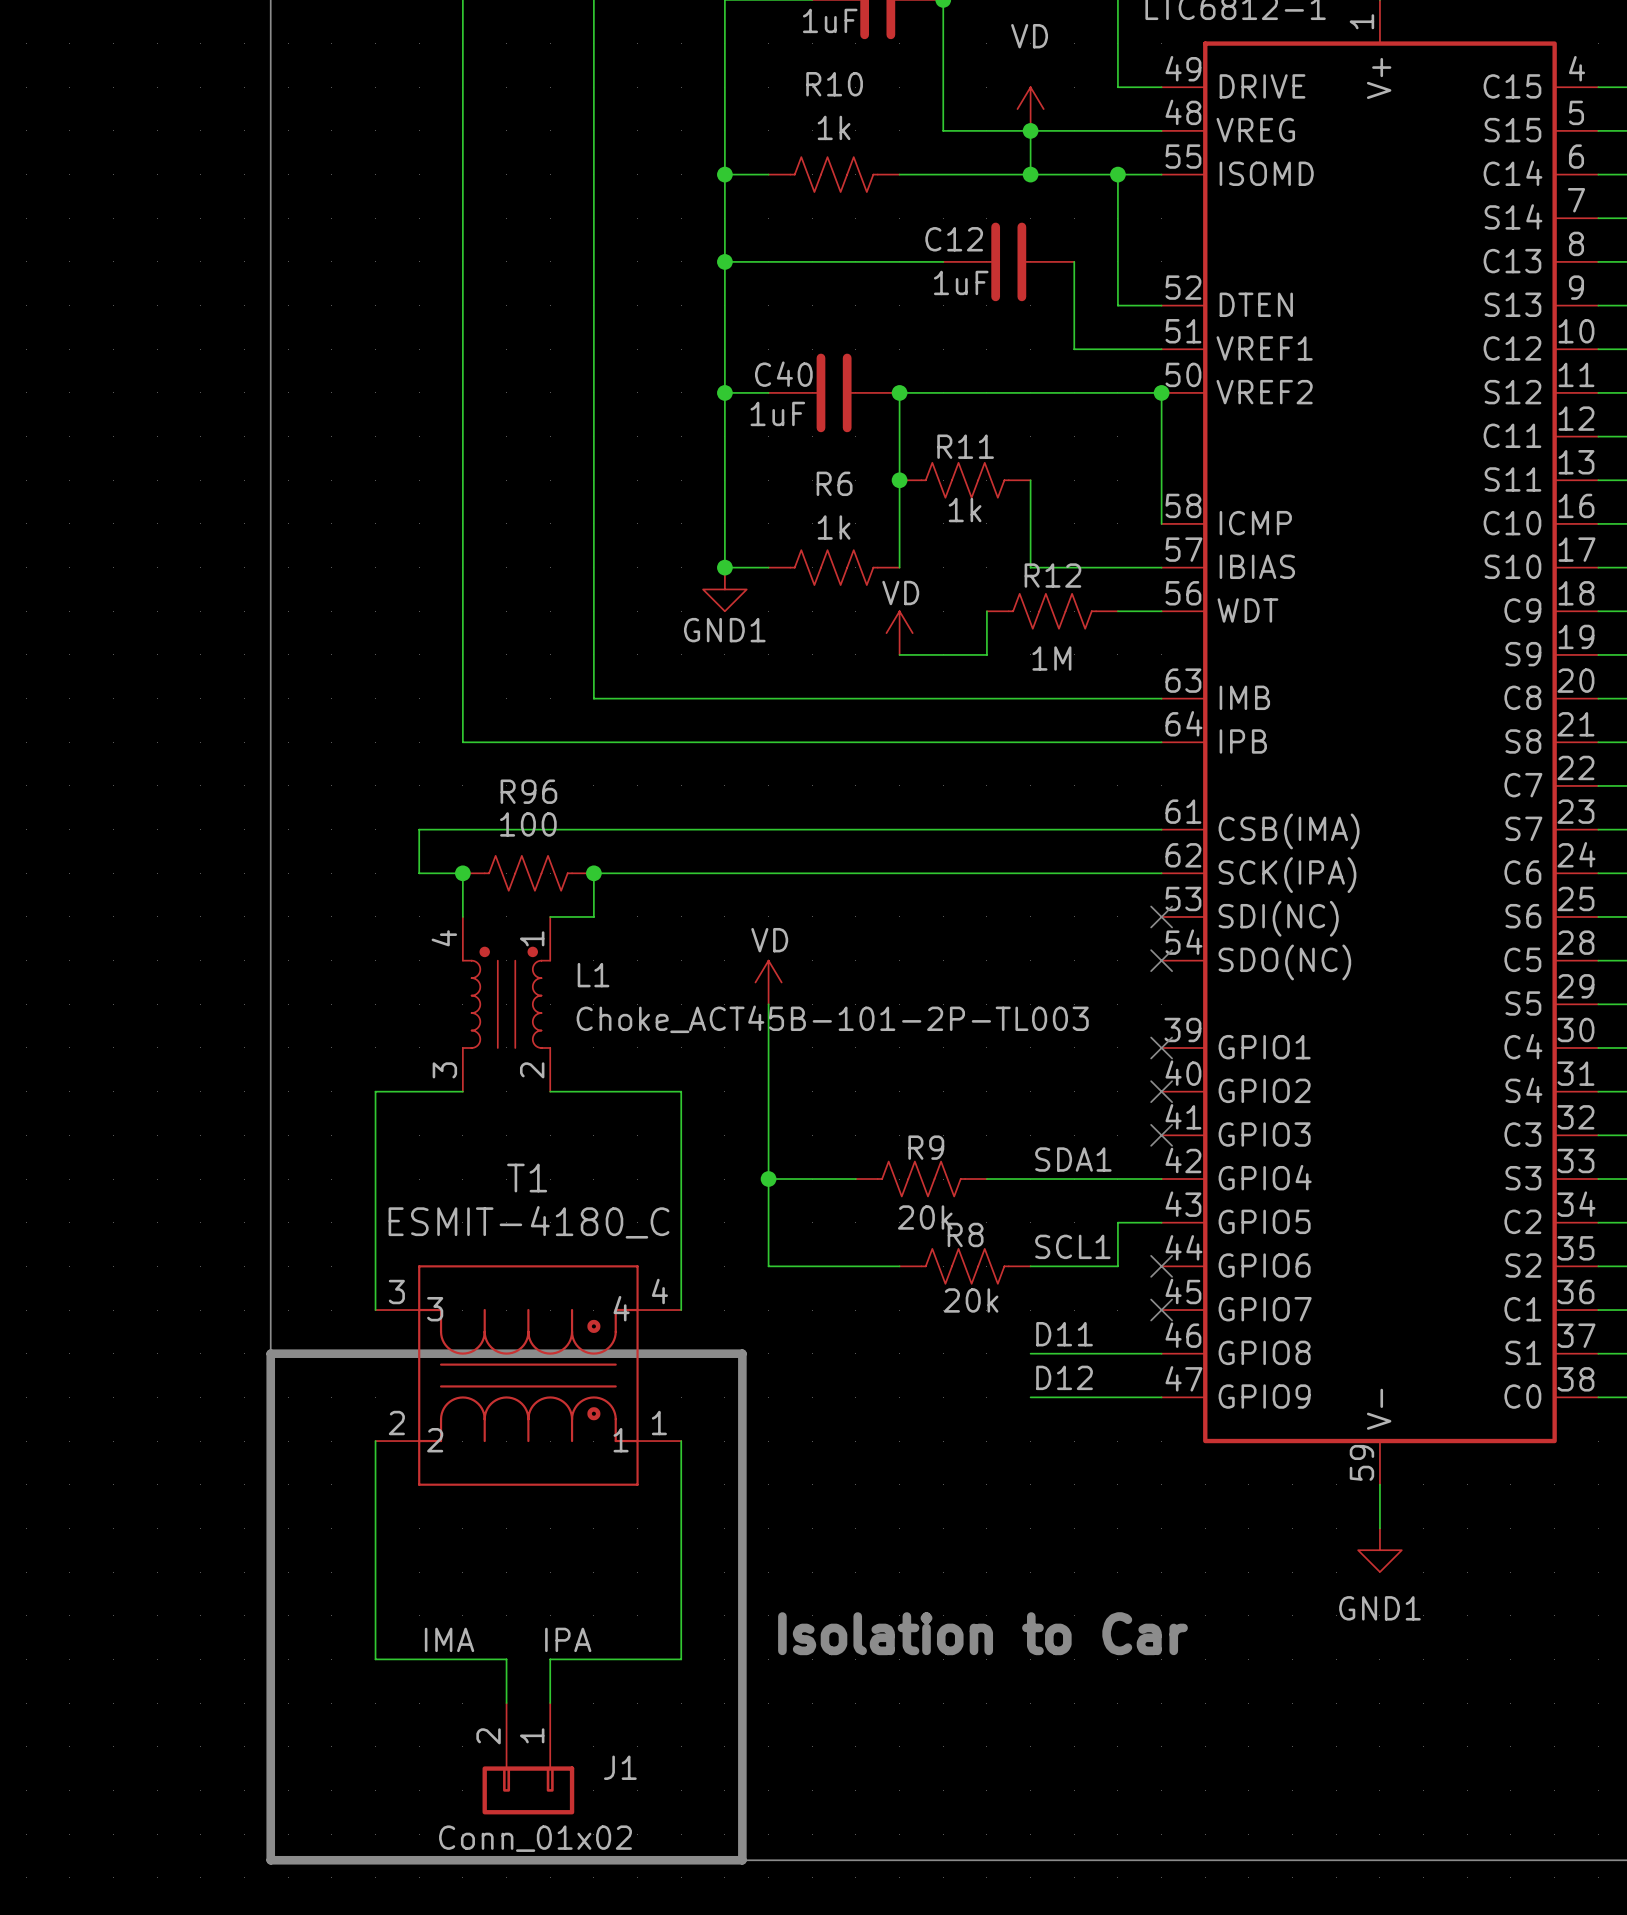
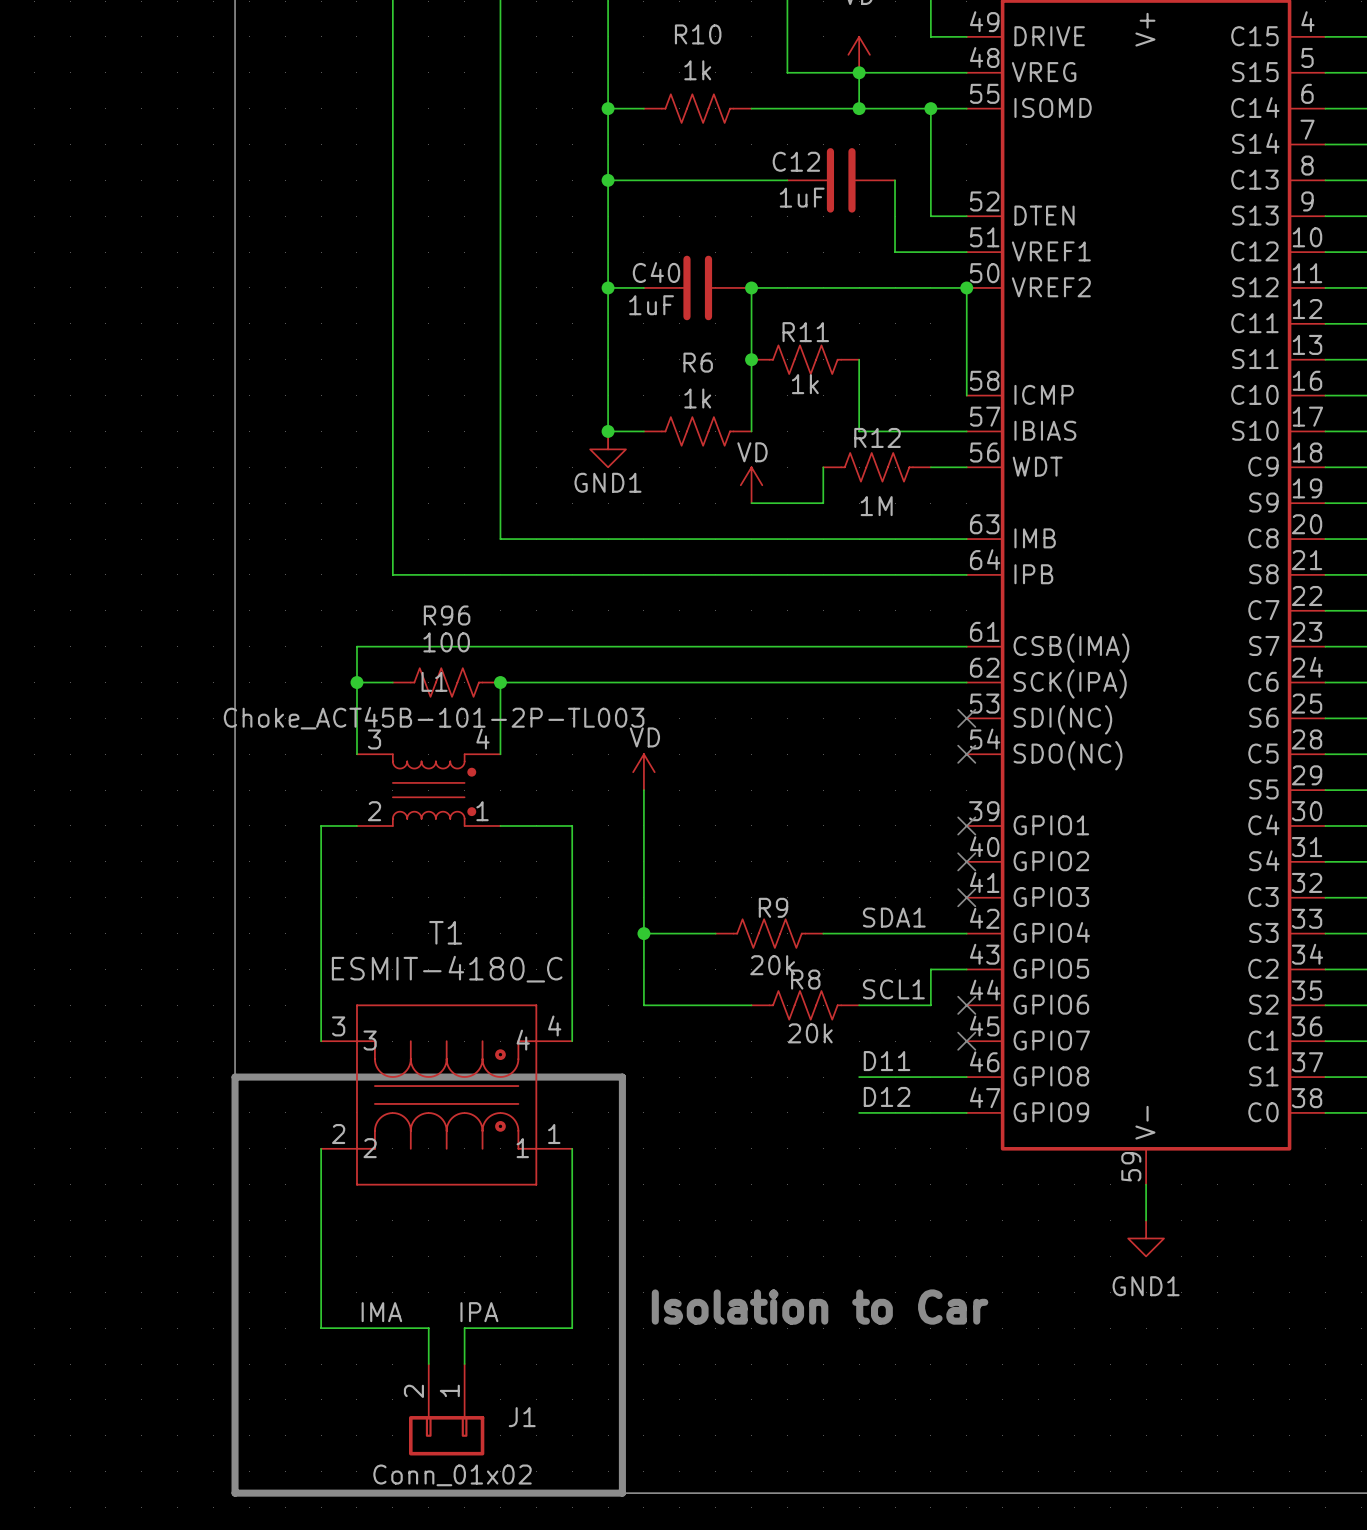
wire: none -> (356, 682) (356, 754)
wire: (462, 873) (462, 916) -> none
junction position: (462, 873) -> (356, 682)
wire: (550, 916) (593, 916) -> (500, 754) (500, 718)
L1 name position: L1 (593, 975) -> L1 (434, 681)
L1 rotation: 0° (506, 997) -> 90° clockwise (434, 790)
L1 value position: Choke_ACT45B-101-2P-TL003 (832, 1019) -> Choke_ACT45B-101-2P-TL003 (434, 718)
wire: (375, 1091) (462, 1091) -> (321, 861) (321, 825) (356, 825)
wire: (550, 1091) (681, 1091) -> (500, 825) (572, 825) (572, 861)

